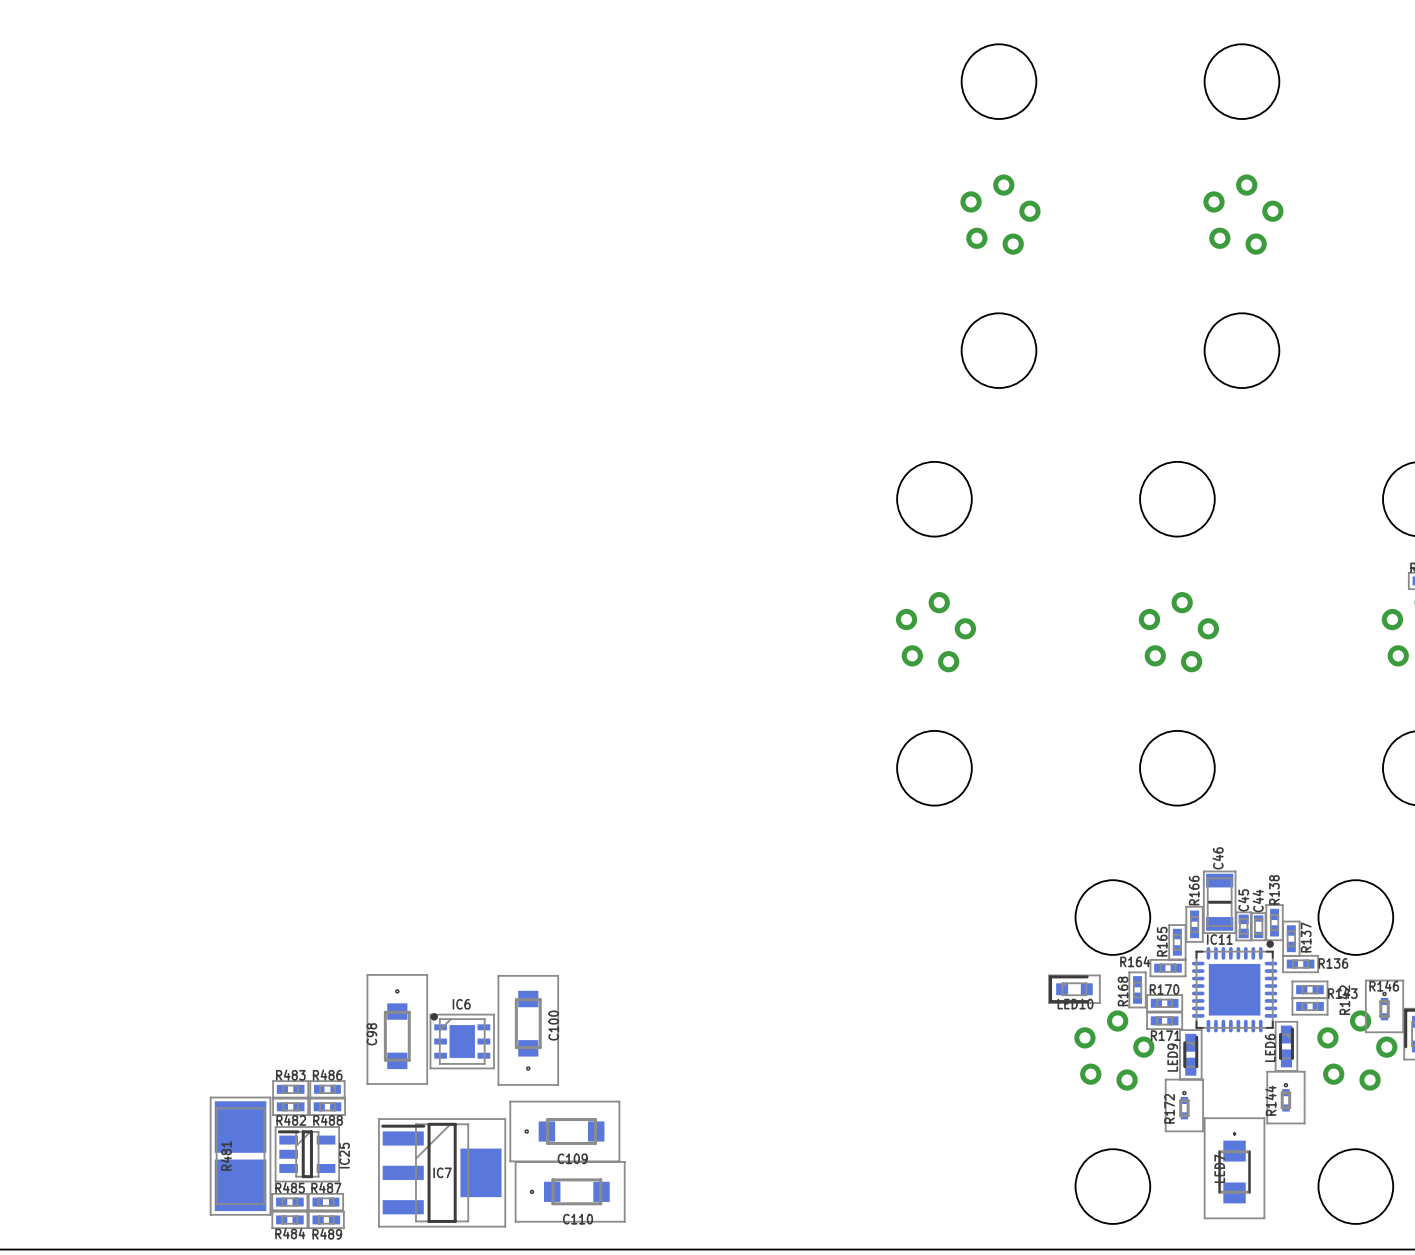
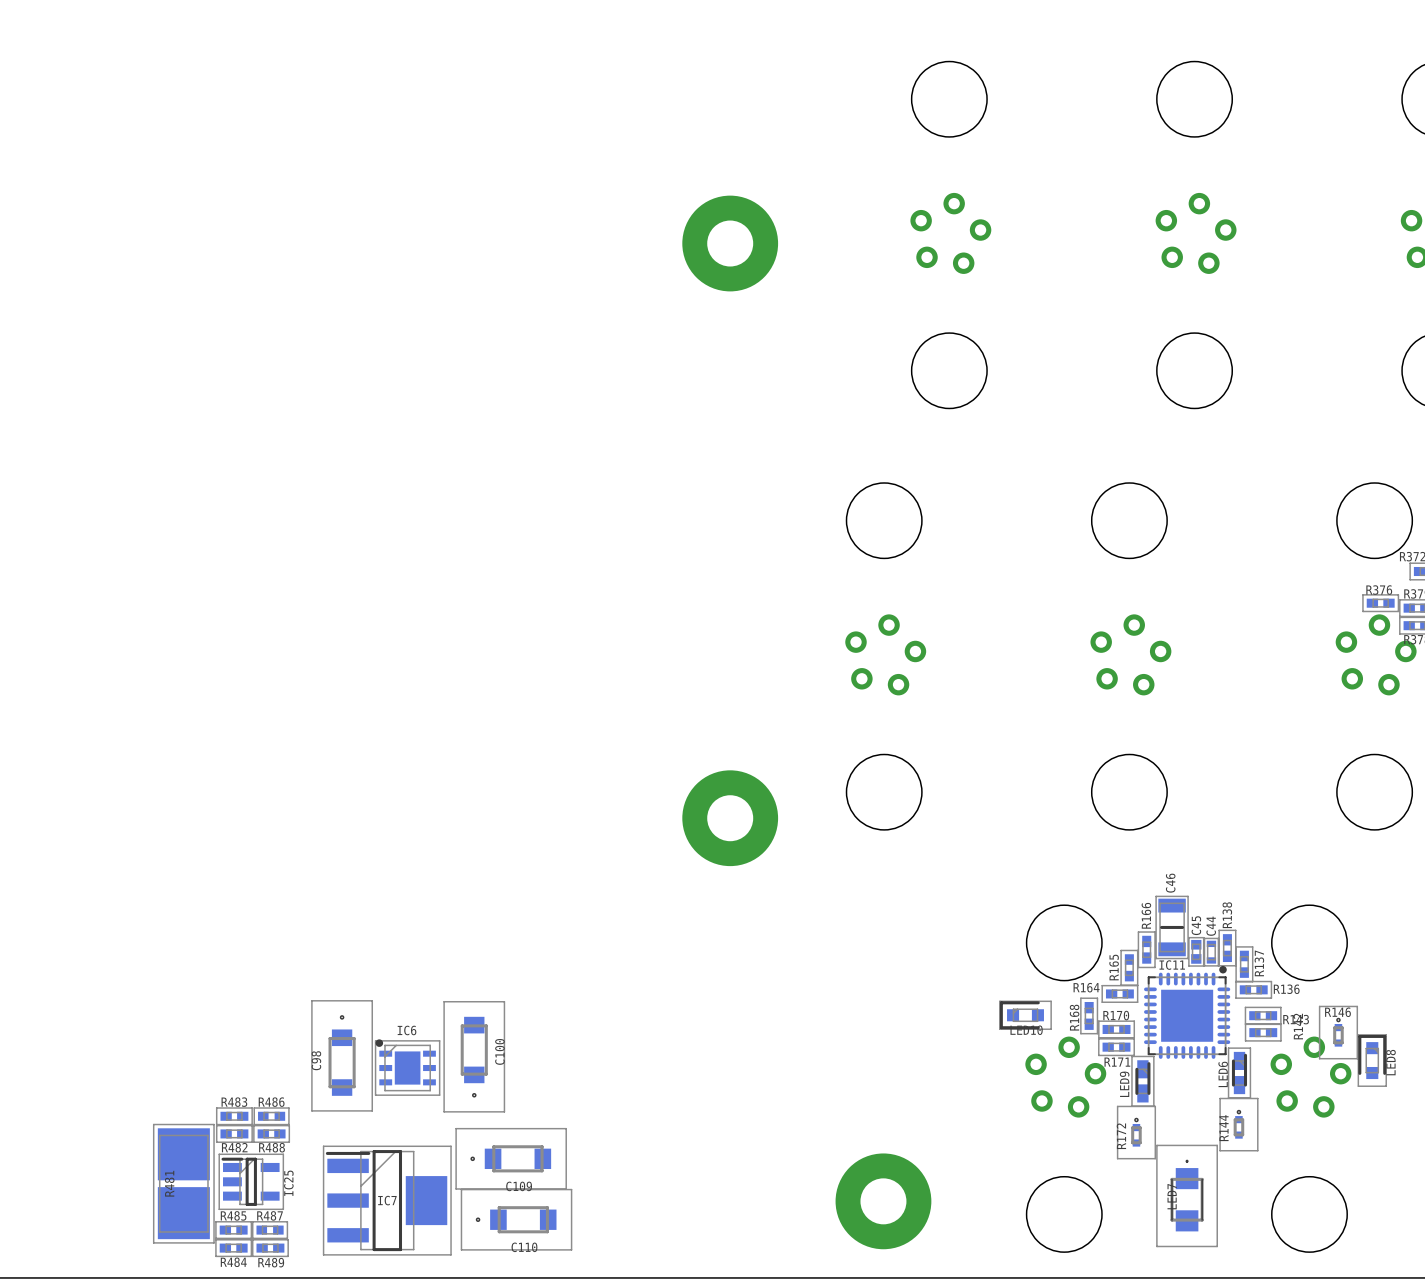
part: none -> (730, 243)
part: none -> (730, 818)
part: none -> (883, 1201)

